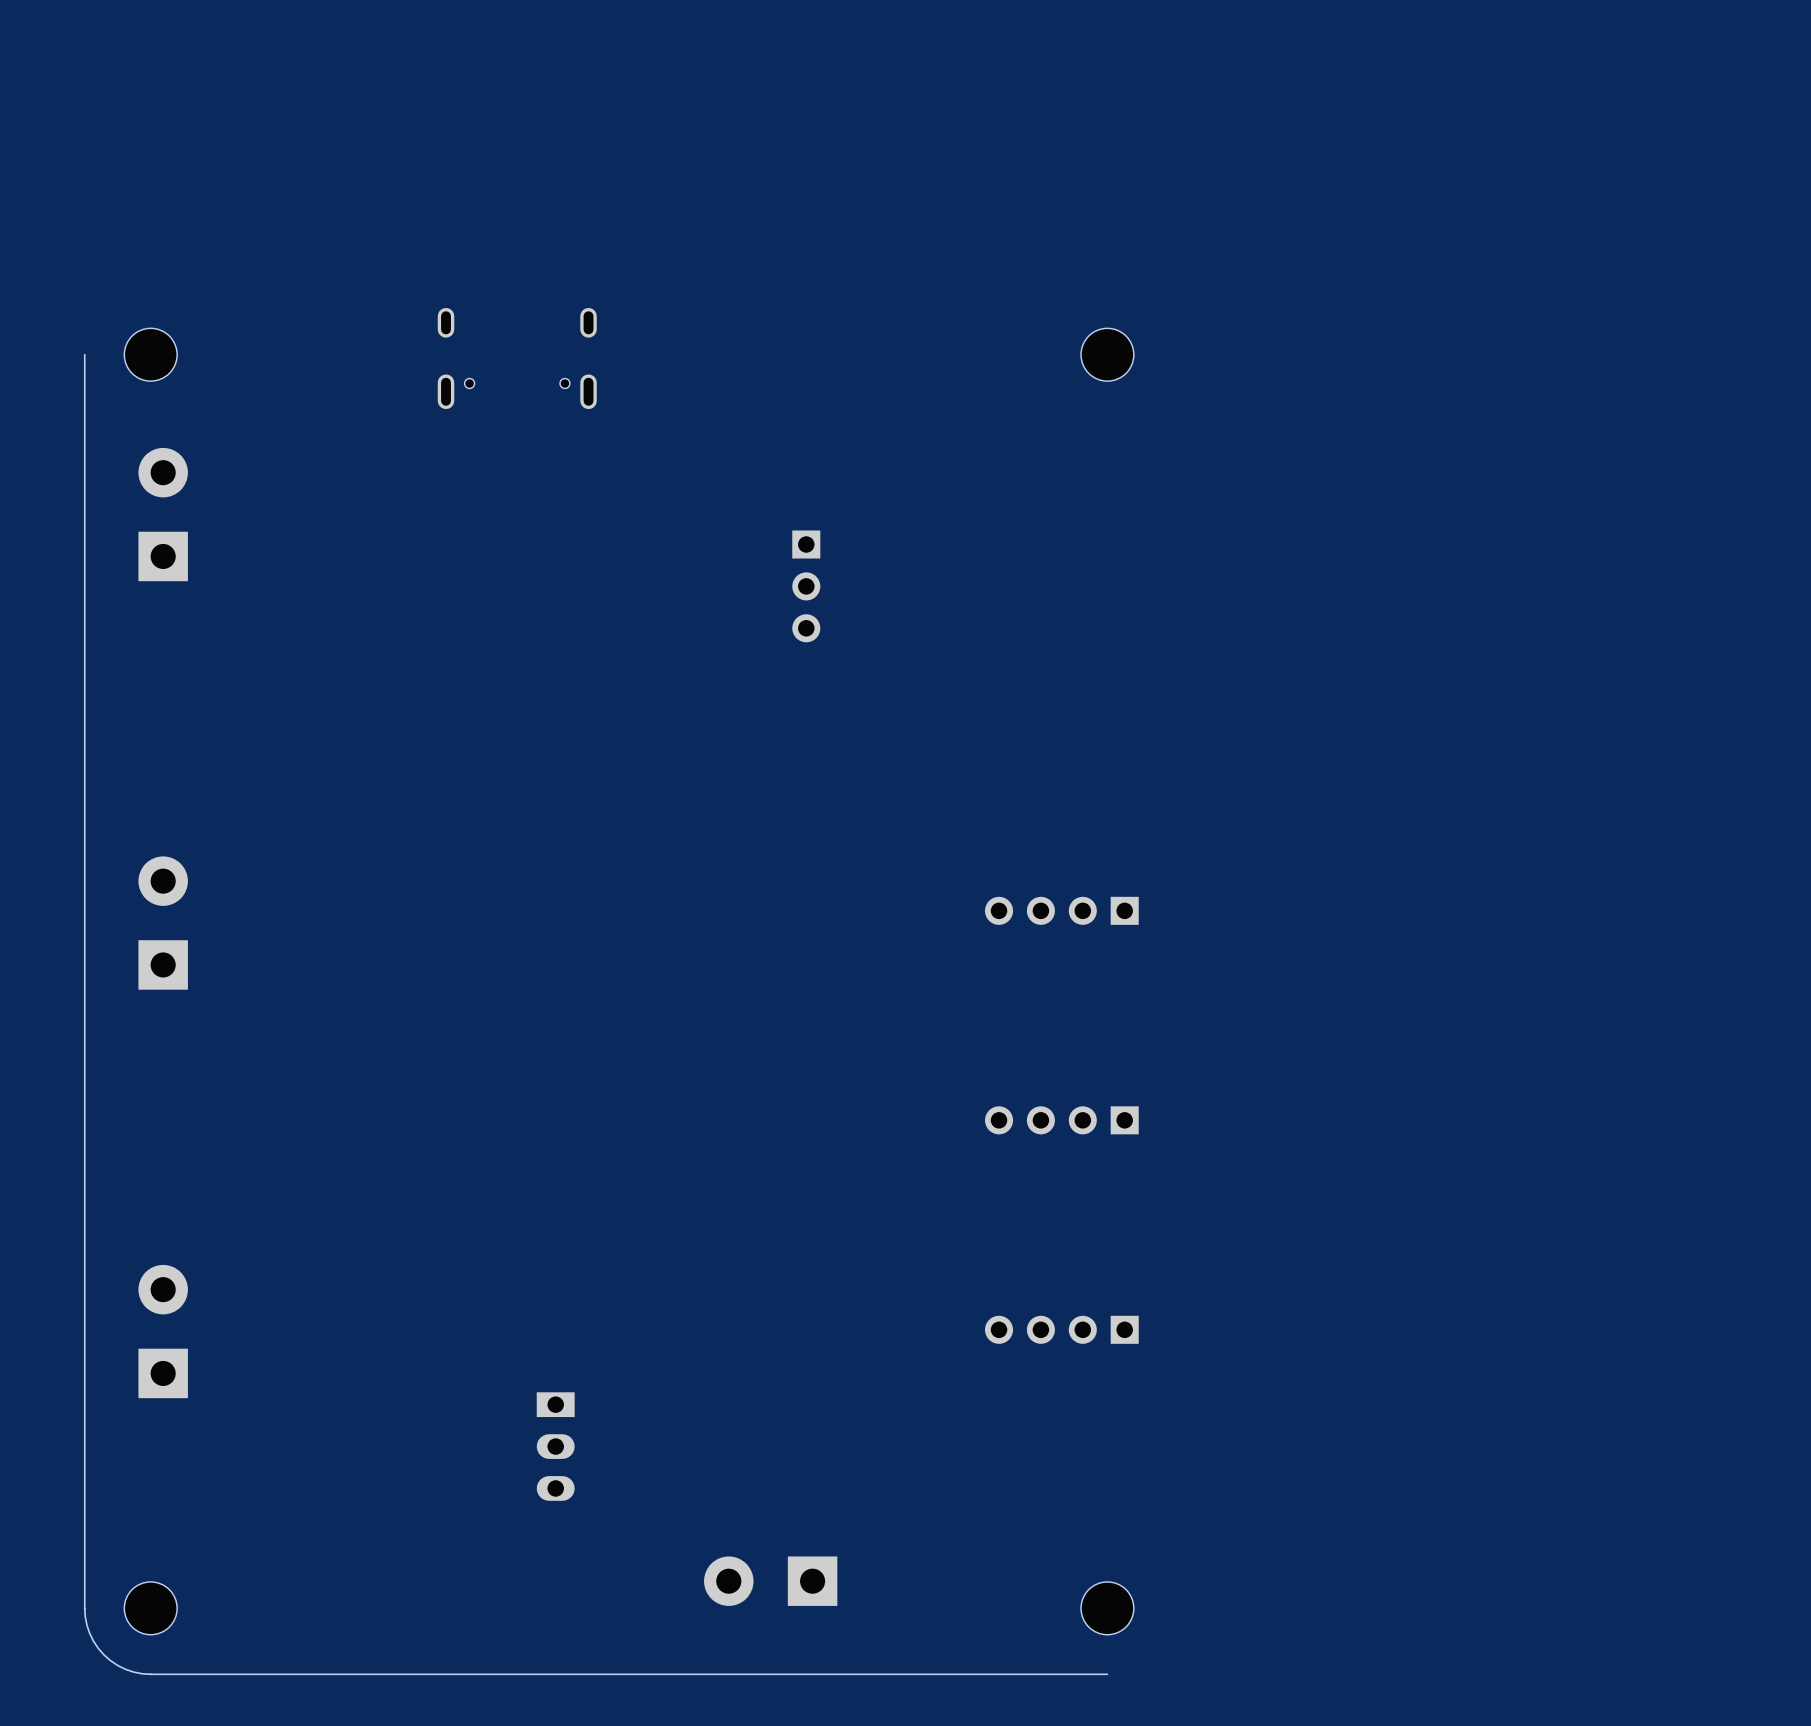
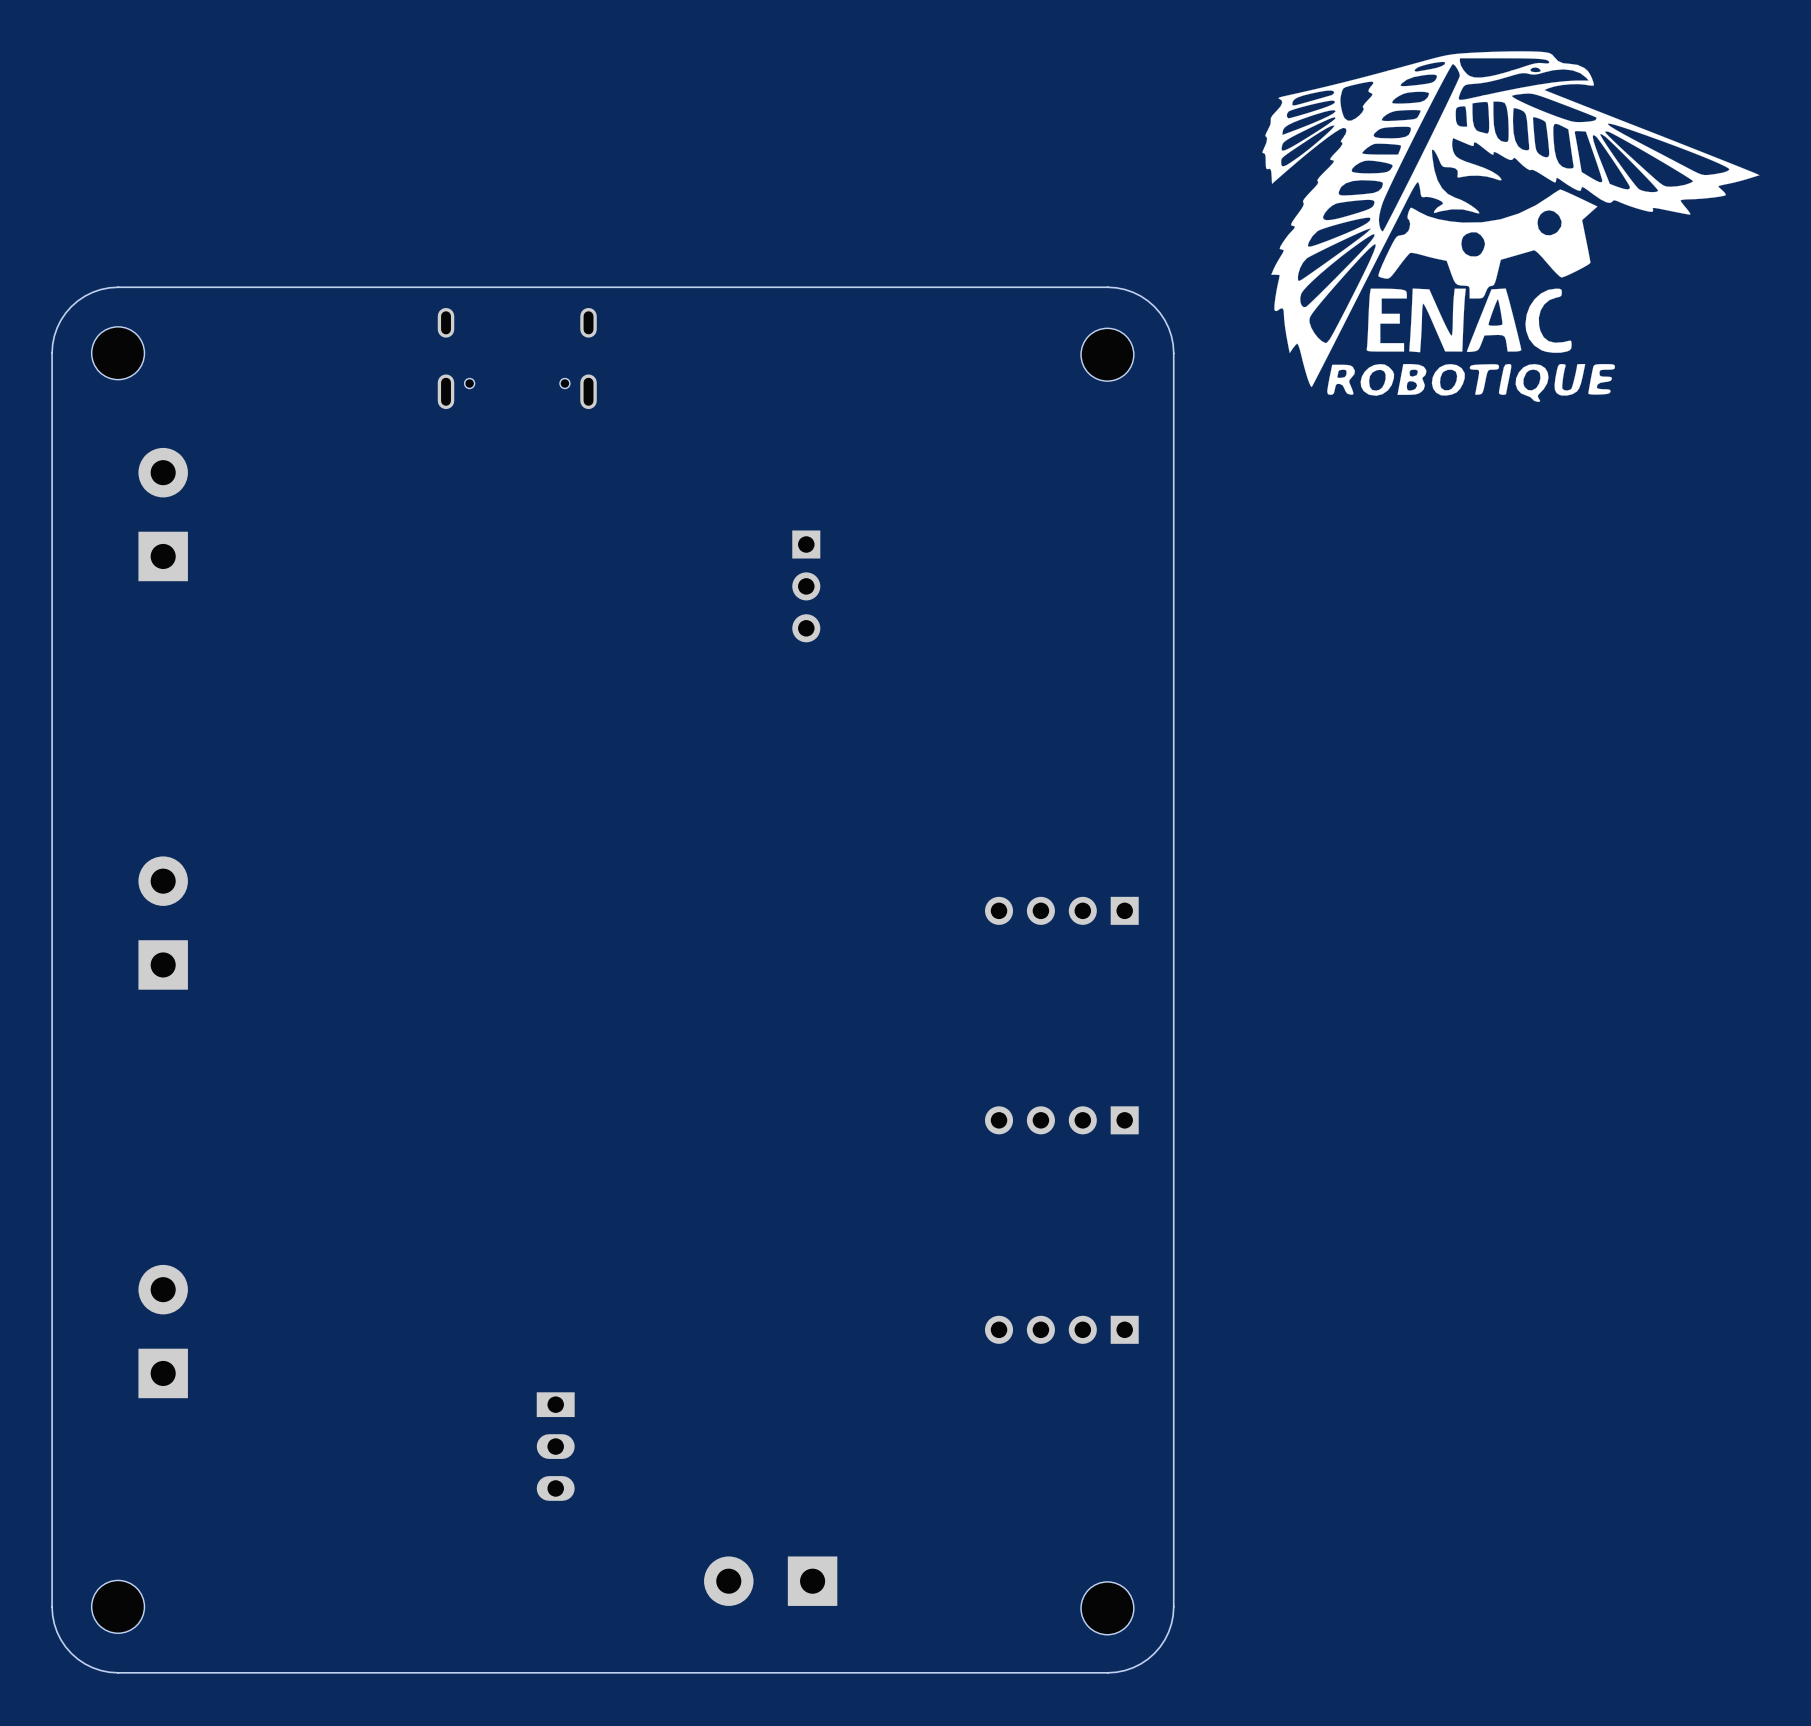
drawing: none -> [1262, 51, 1760, 402]
board edge: none -> (1107, 287) (118, 287) (100, 289) (85, 296) (65, 313) (54, 336) (52, 353) (52, 1606) (57, 1632) (65, 1647) (77, 1659) (92, 1667) (118, 1672) (1107, 1672) (1133, 1667) (1147, 1659) (1160, 1647) (1168, 1632) (1173, 1606) (1173, 353) (1168, 328) (1154, 306) (1133, 292) (1107, 287)
board edge: (84, 354) (84, 1608) (89, 1633) (98, 1648) (117, 1665) (133, 1672) (150, 1674) (1107, 1674) -> none
part position: (150, 354) -> (118, 353)
part position: (150, 1608) -> (118, 1606)

